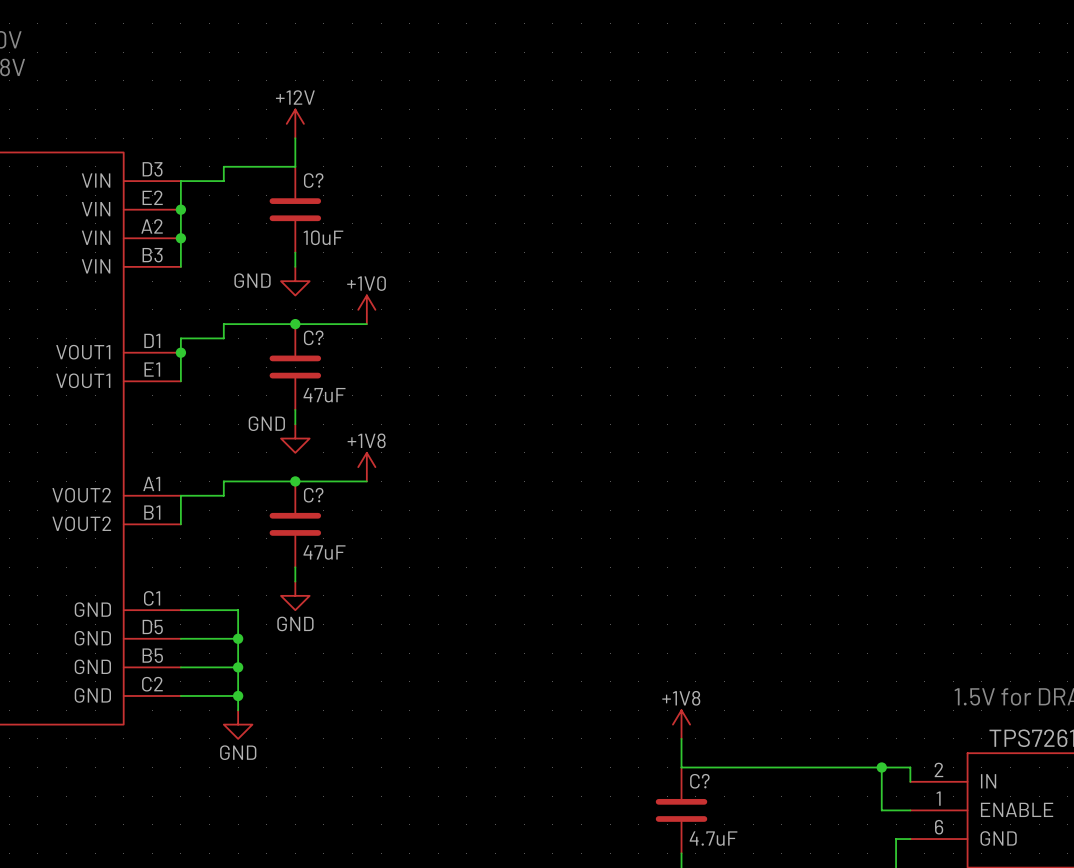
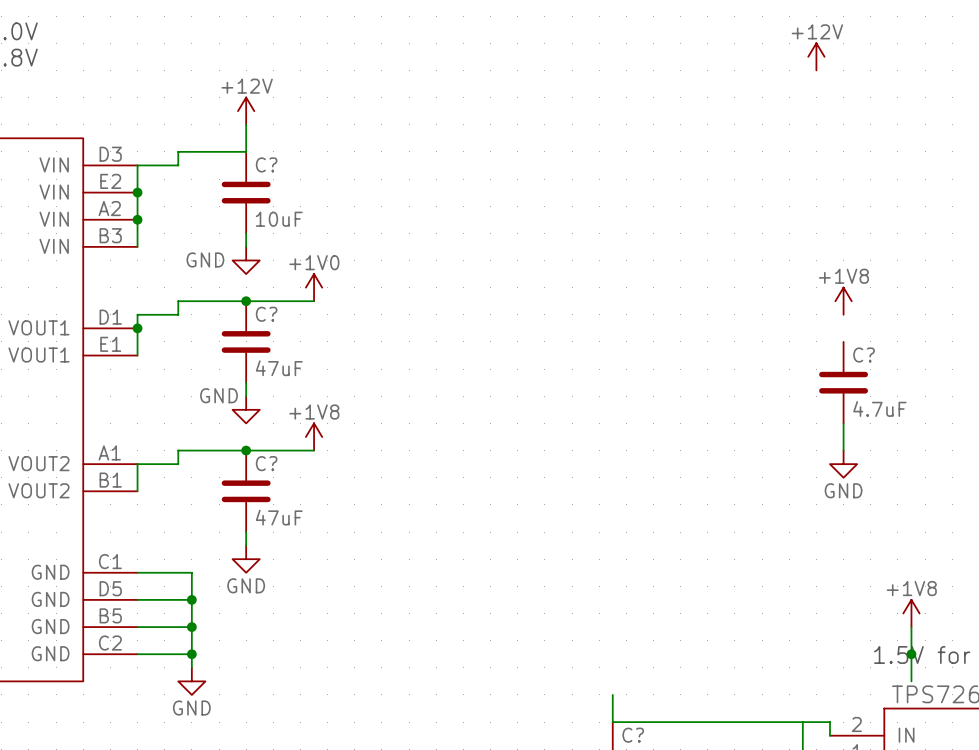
power symbol: none -> +12V (816, 56)
power symbol: none -> +1V8 (843, 301)
C?: none -> 4.7uF (843, 382)
wire: none -> (843, 423) (843, 450)
power symbol: none -> GND (843, 464)
power symbol: none -> +1V8 (911, 613)
wire: none -> (911, 627) (911, 681)
junction: none -> (911, 654)
power symbol: +1V8 (681, 724) -> none
junction: (881, 767) -> none

